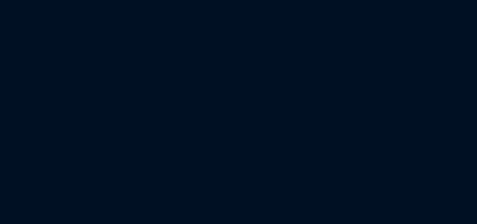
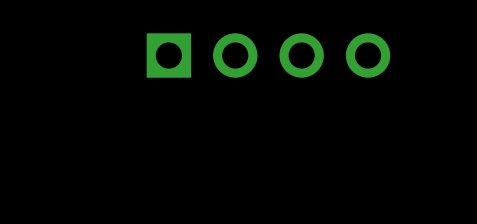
part: none -> (268, 55)

